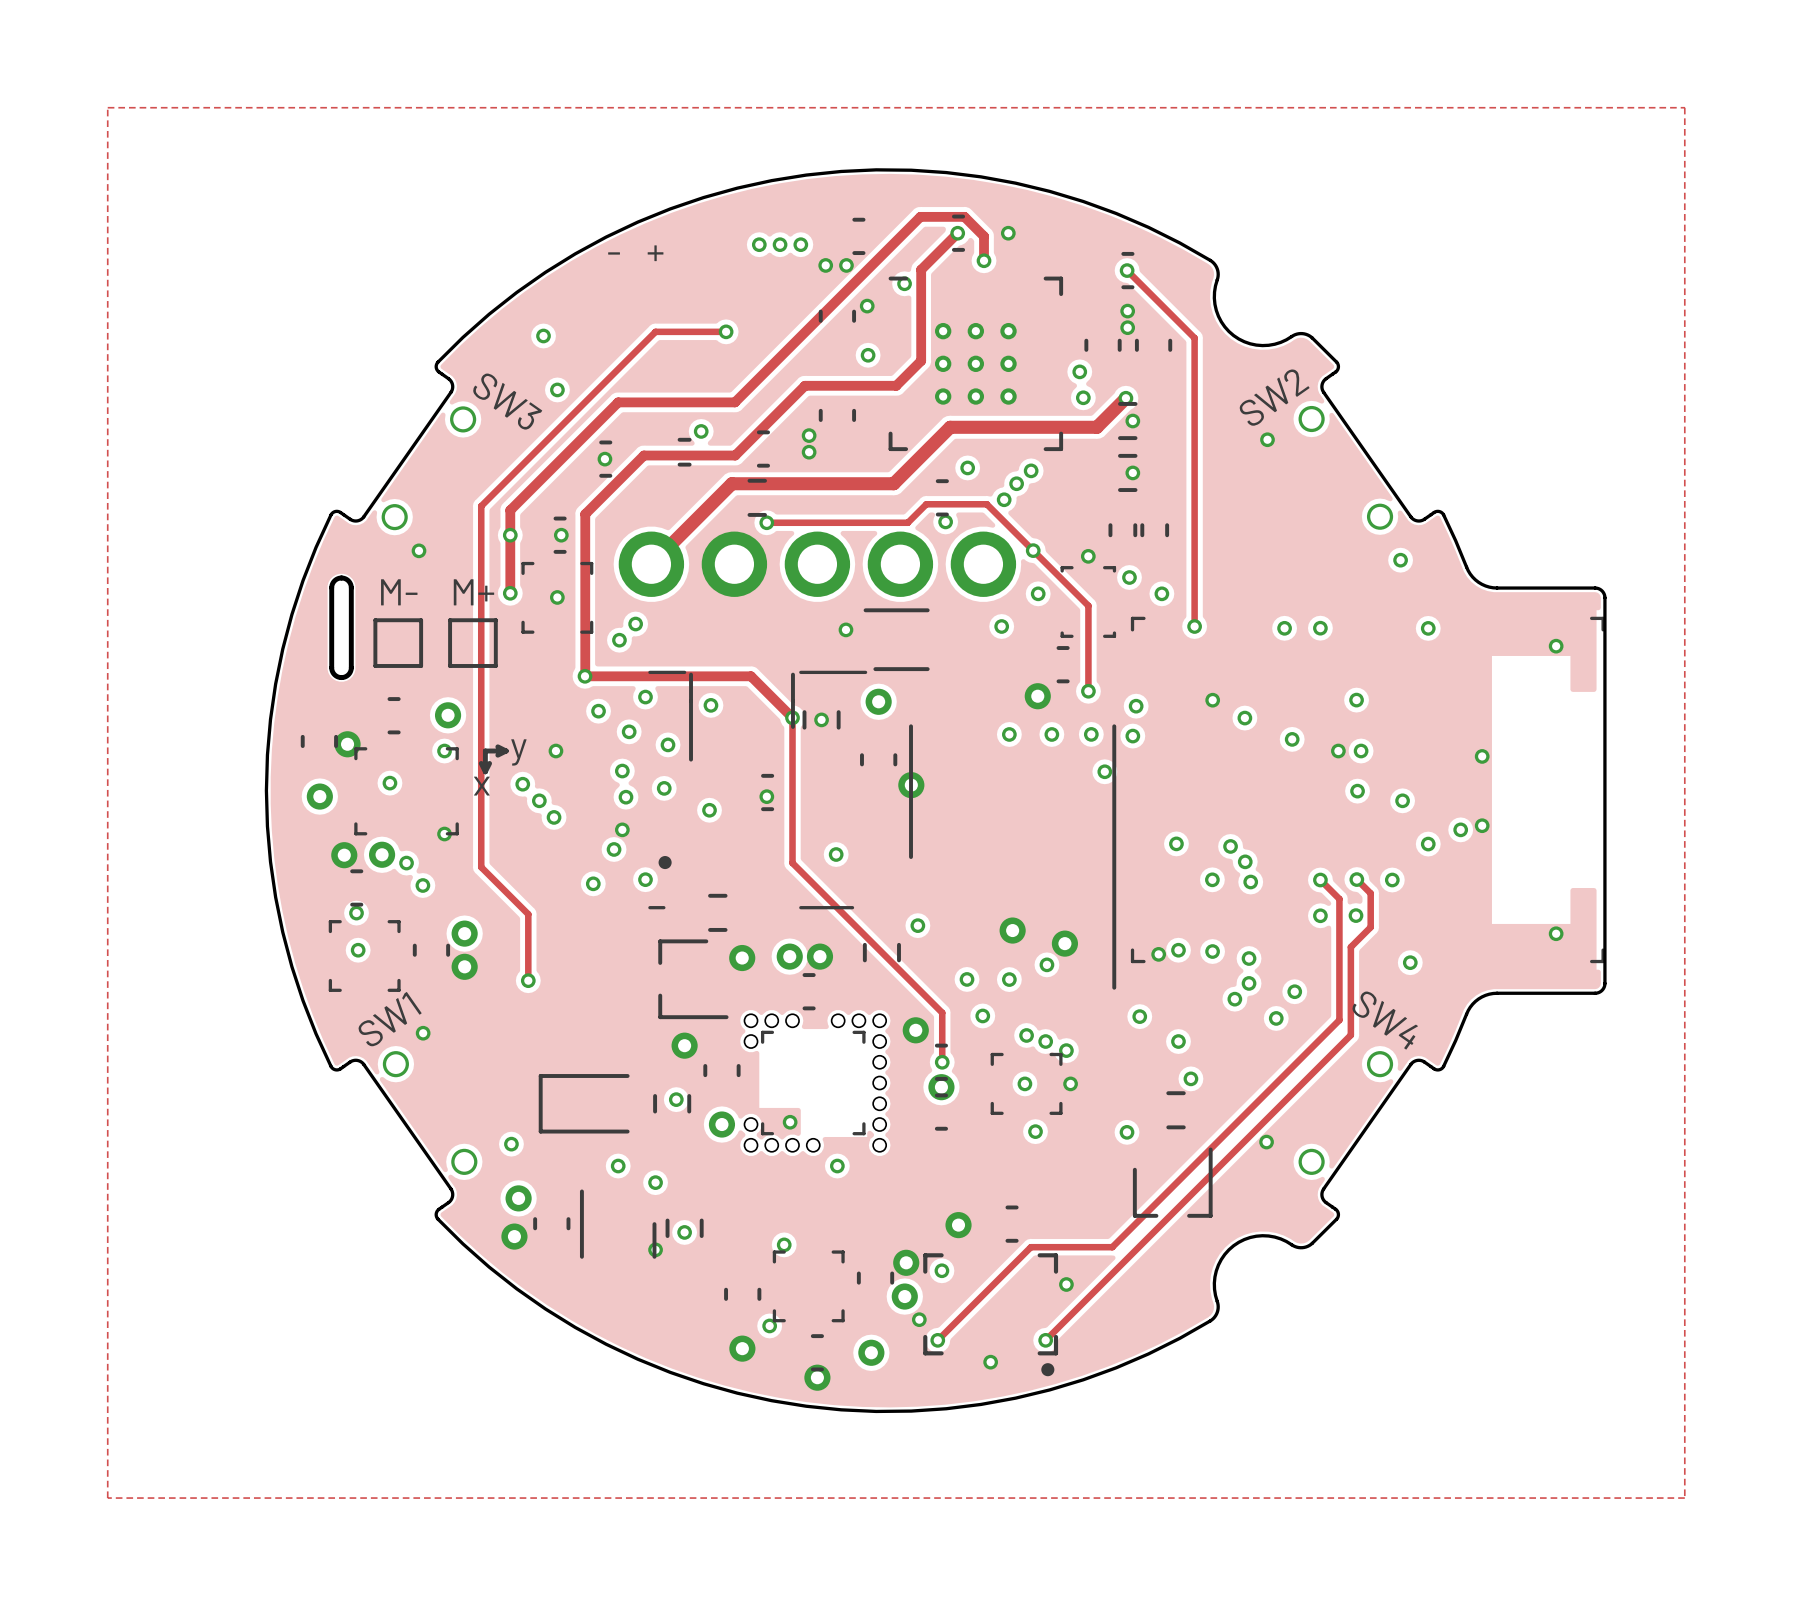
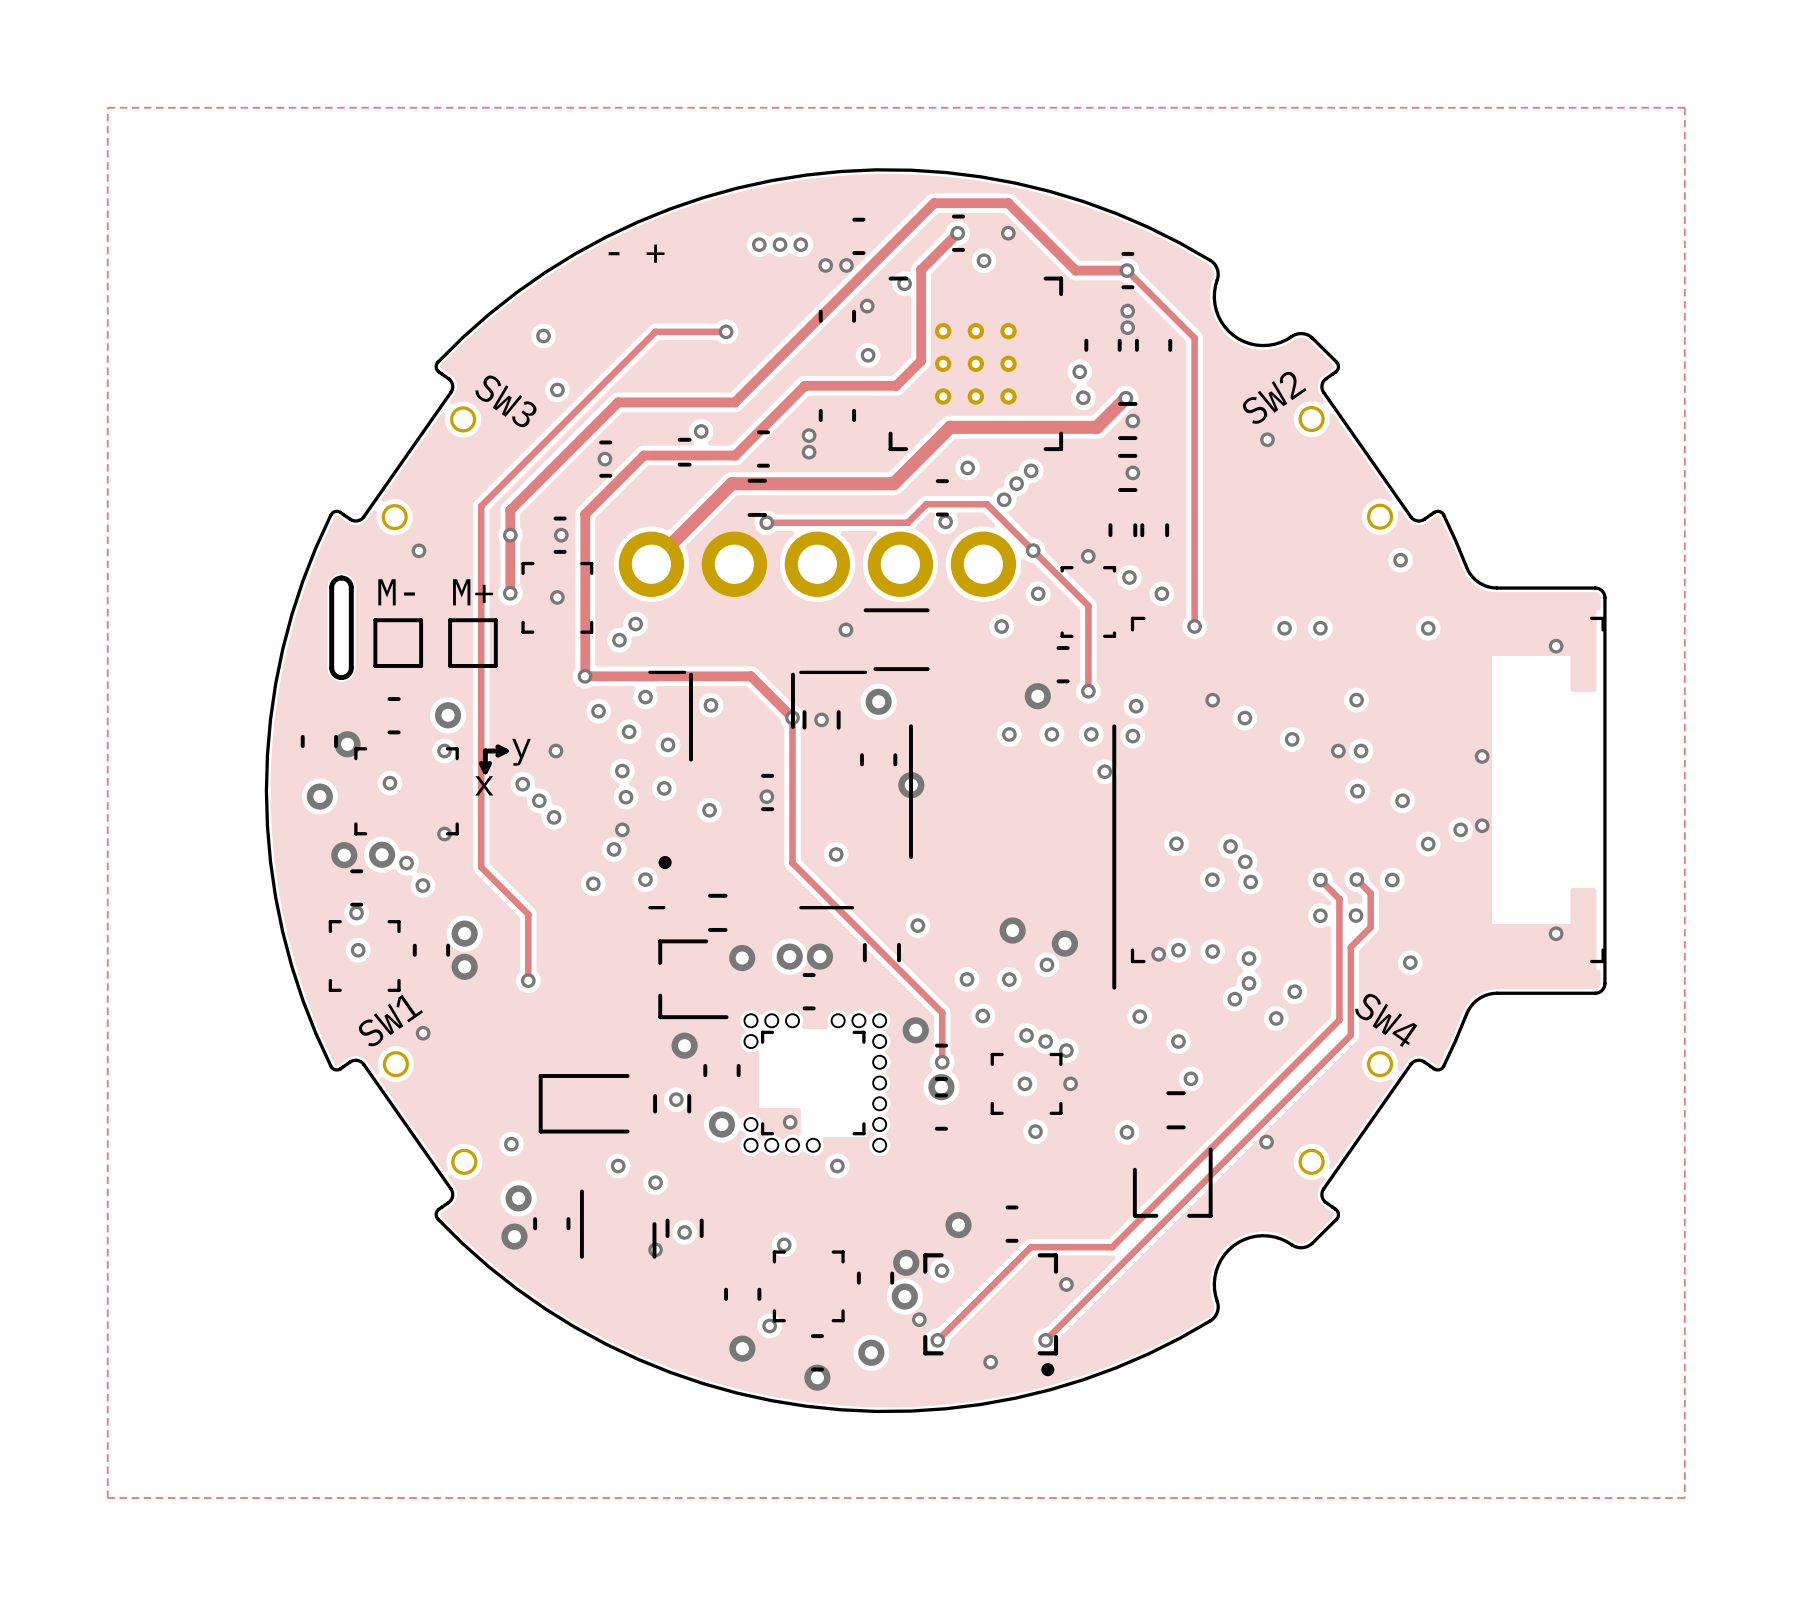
track: (920, 216) (964, 216) (984, 236) (984, 260) -> (920, 216) (934, 203) (1008, 203) (1075, 270) (1127, 270)

